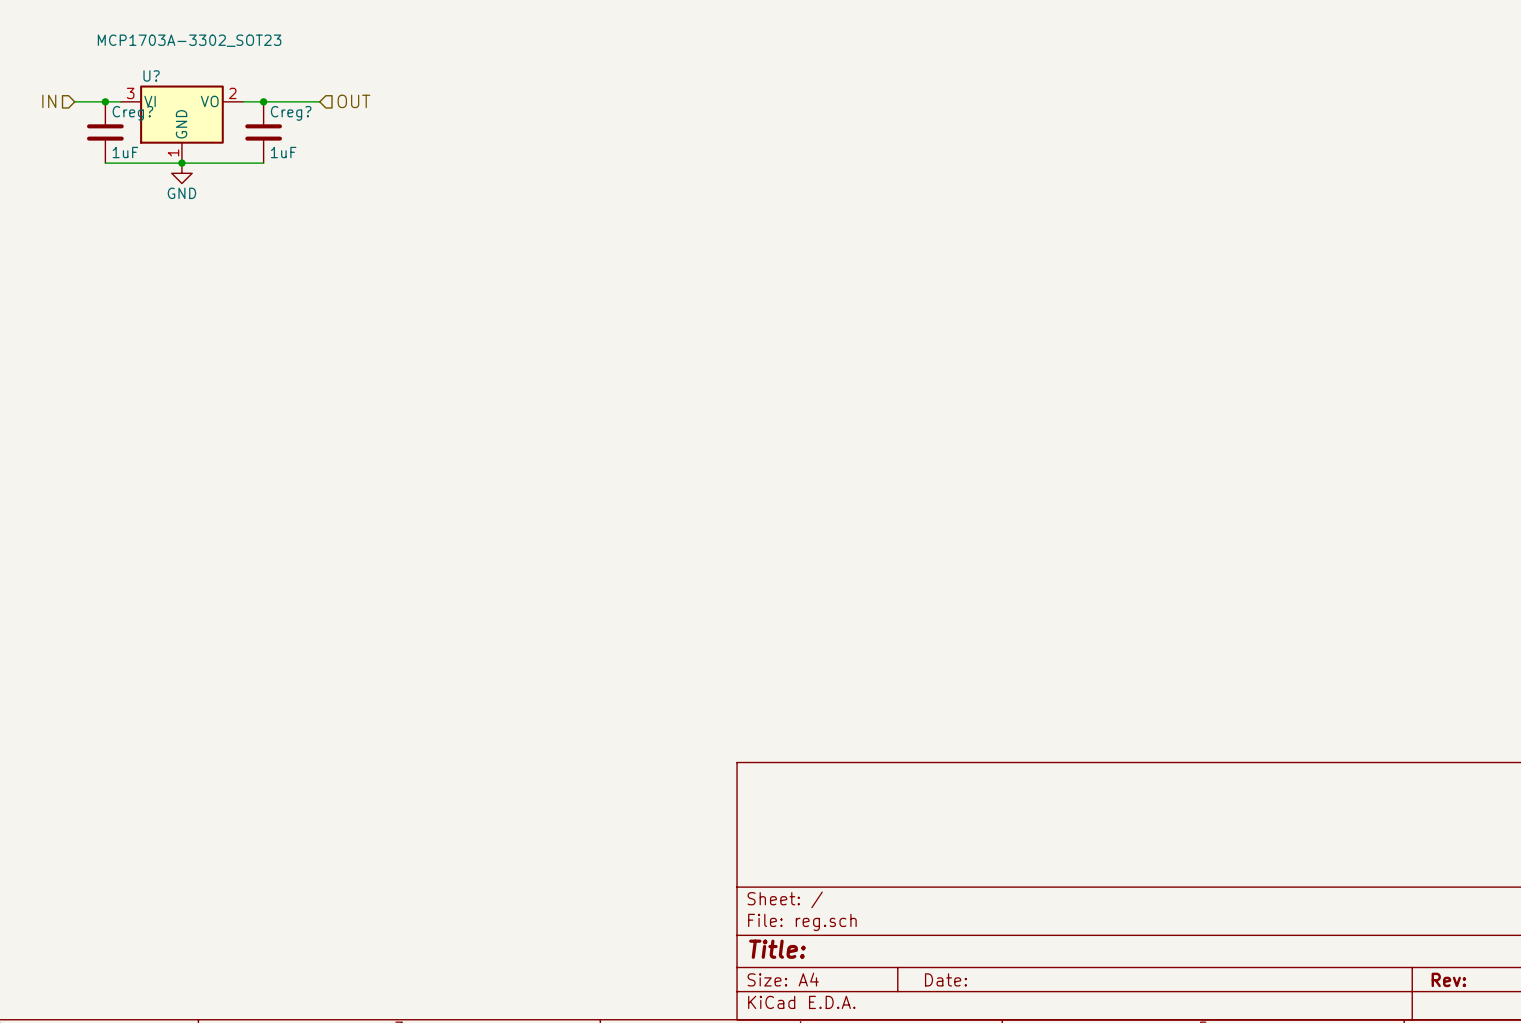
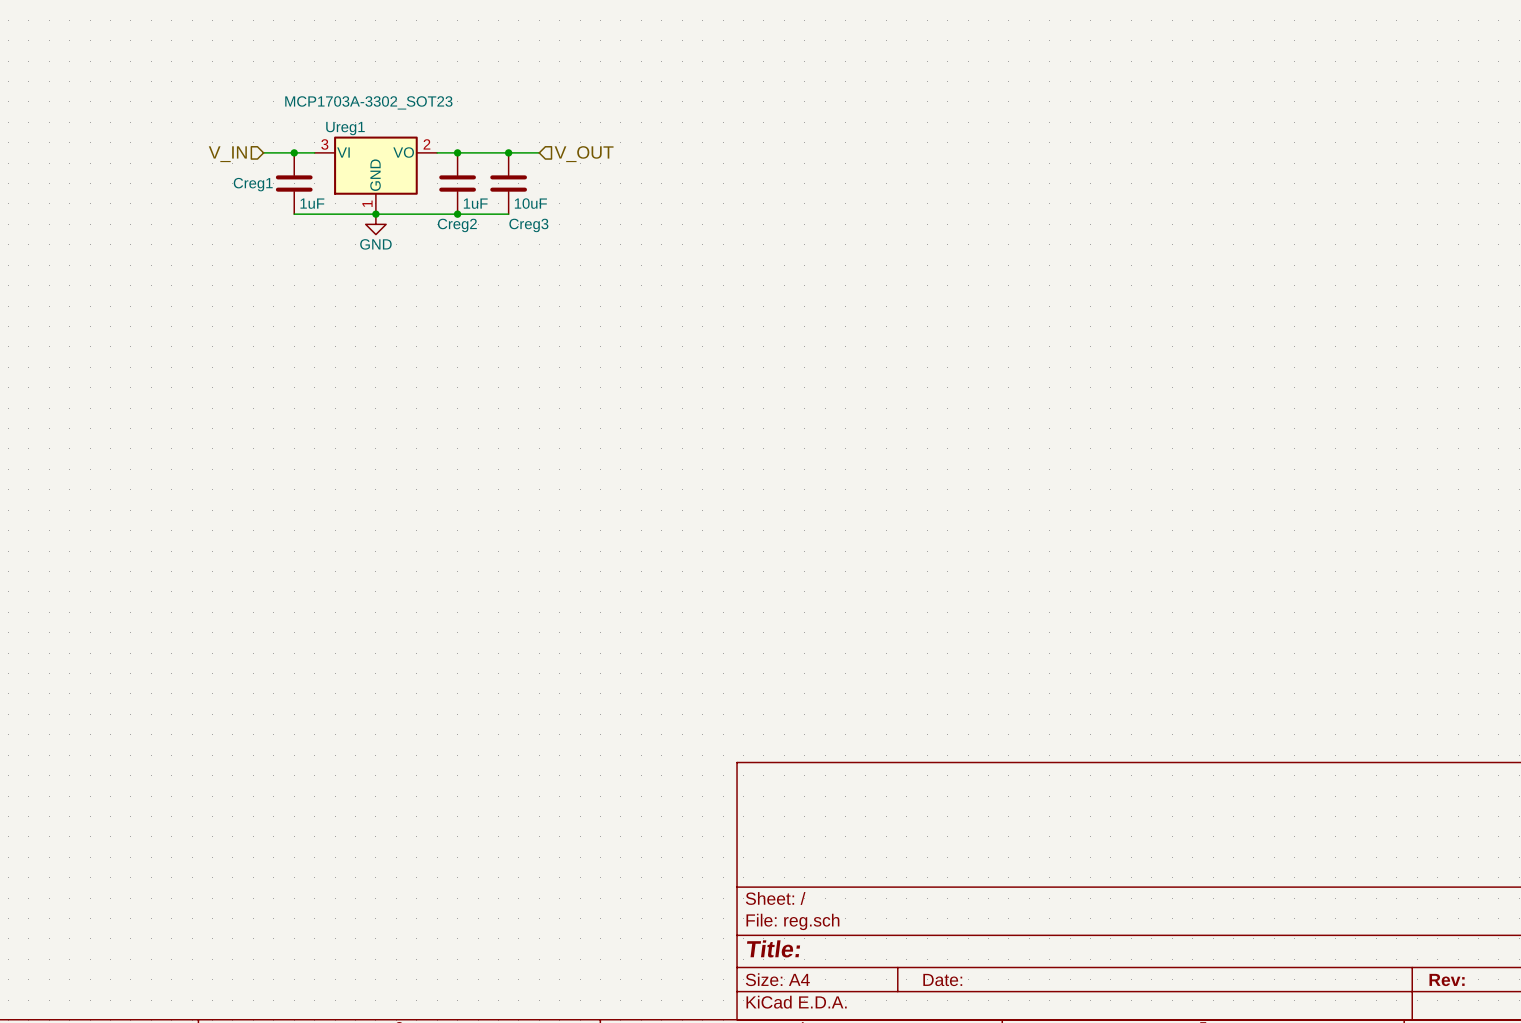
hierarchical label: IN (49, 101) -> none
wire: (74, 101) (120, 101) -> none
junction: (105, 101) -> none
wire: (243, 101) (319, 101) -> none
junction: (263, 101) -> none
hierarchical label: OUT (353, 101) -> none
U?: MCP1703A-3302_SOT23 (181, 124) -> none
Creg?: 1uF (105, 132) -> none
Creg?: 1uF (263, 132) -> none
wire: none -> (263, 152) (314, 152)
junction: none -> (294, 152)
wire: none -> (437, 152) (539, 152)
junction: none -> (457, 152)
junction: none -> (508, 152)
hierarchical label: none -> V_IN (227, 154)
hierarchical label: none -> V_OUT (584, 154)
wire: (105, 163) (263, 163) -> none
junction: (181, 163) -> none
power symbol position: GND (181, 173) -> GND (375, 224)
Ureg1: none -> MCP1703A-3302_SOT23 (375, 175)
Creg1: none -> 1uF (294, 183)
Creg2: none -> 1uF (457, 183)
Creg3: none -> 10uF (508, 183)
wire: none -> (294, 214) (508, 214)
junction: none -> (375, 214)
junction: none -> (457, 214)

